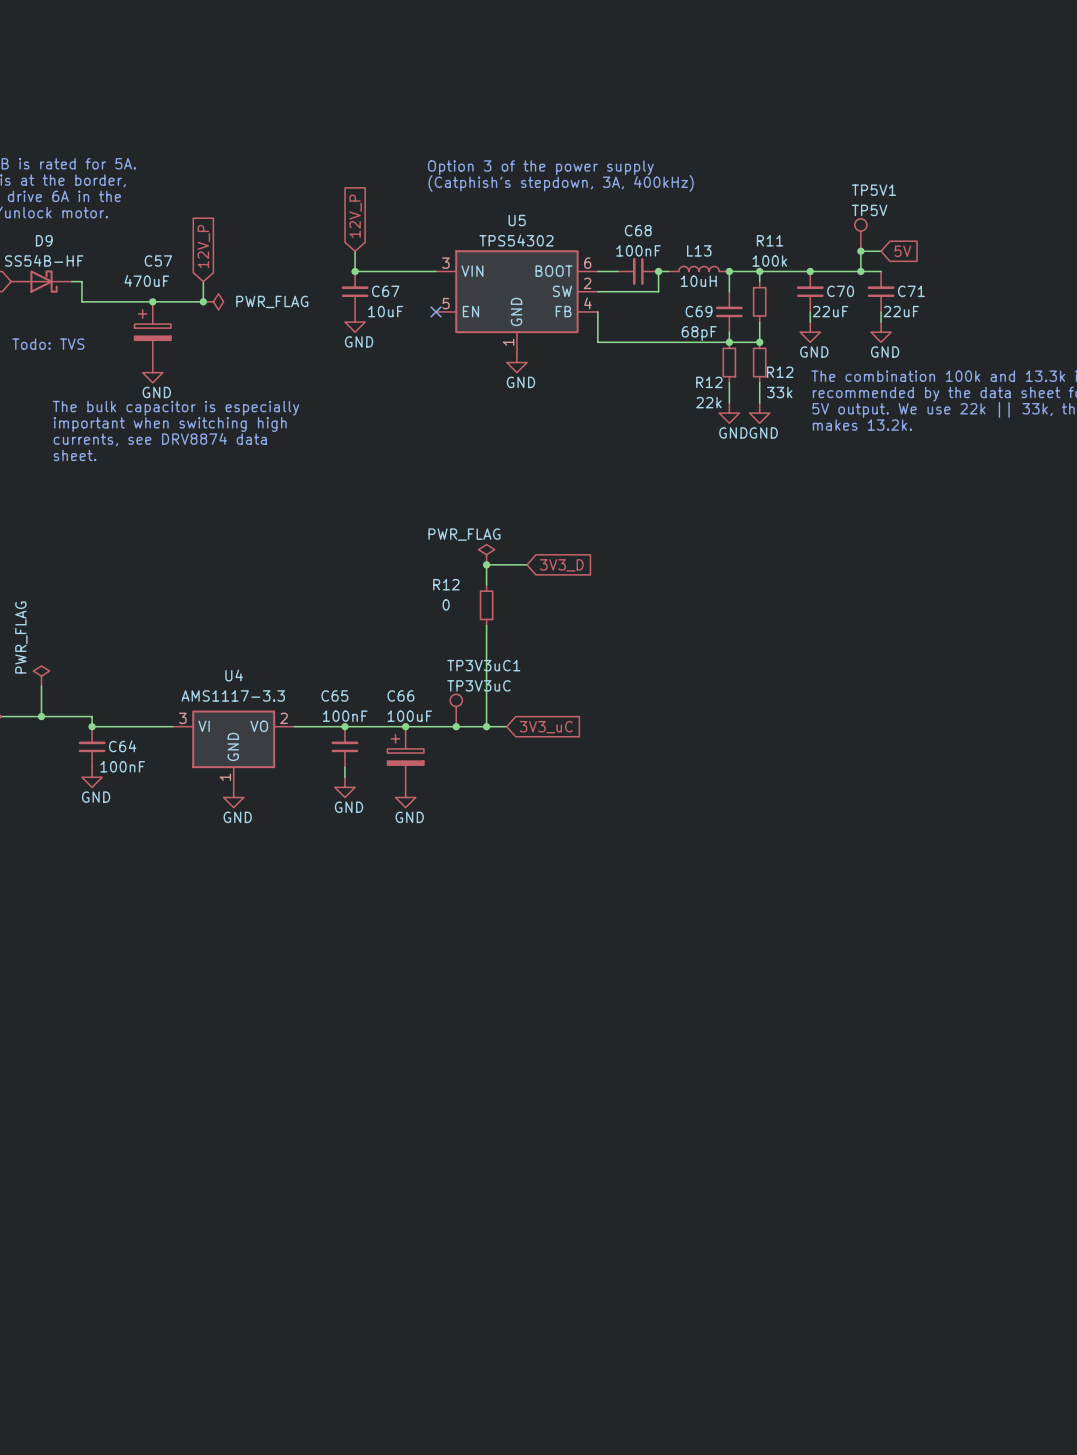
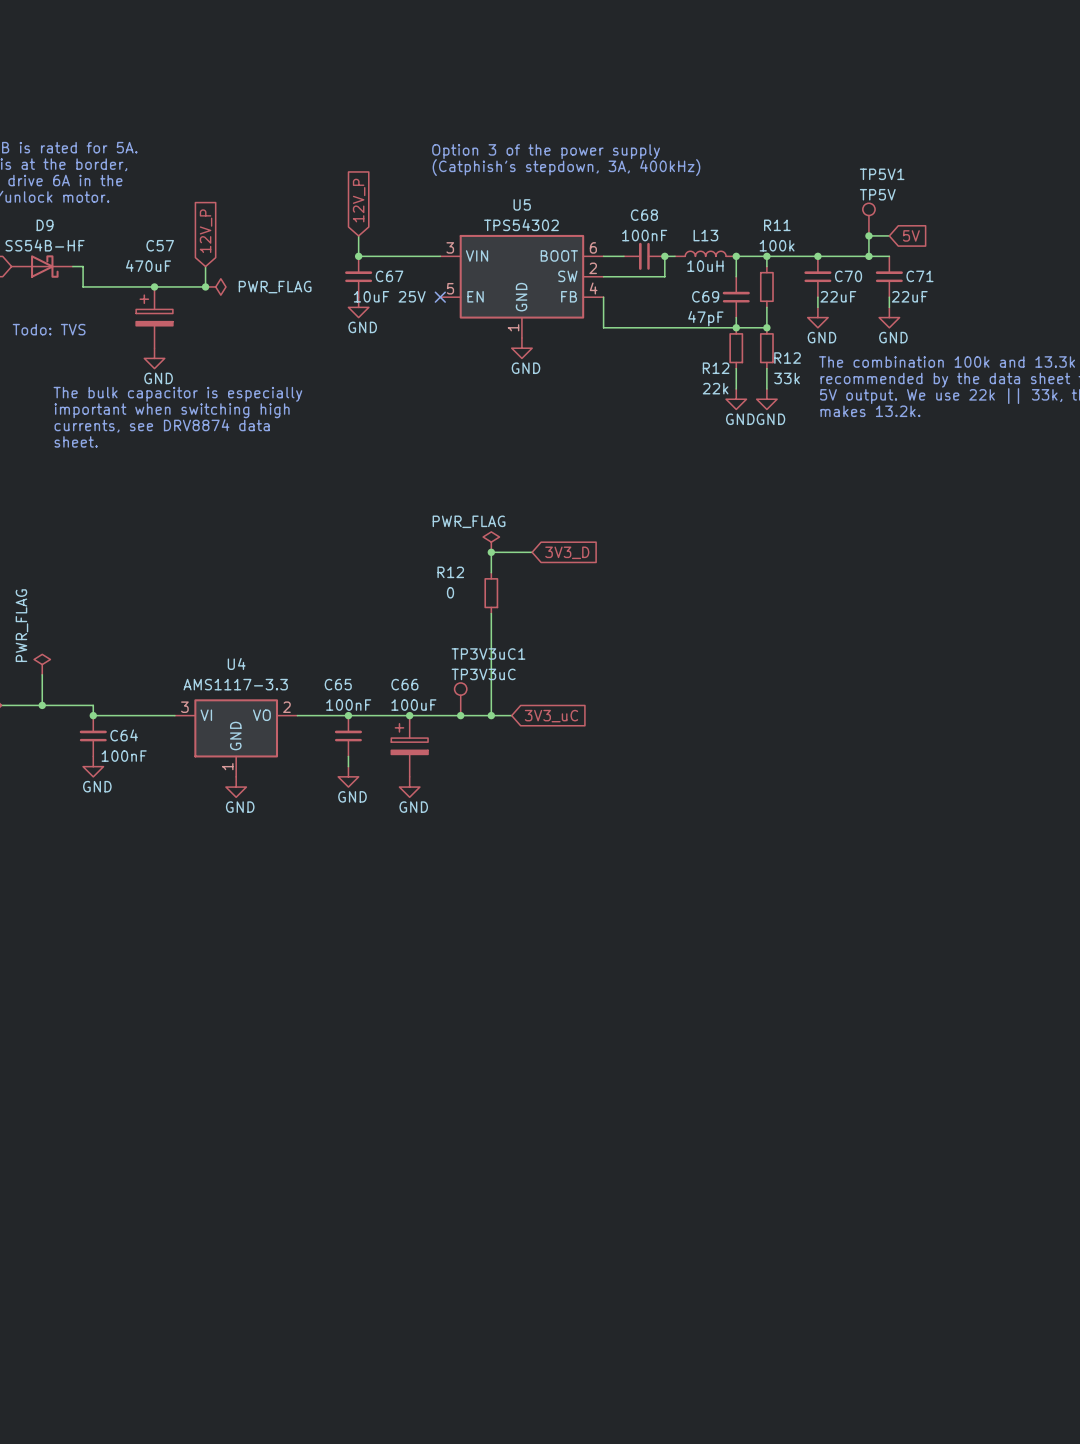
C67 value: 10uF (385, 311) -> 10uF 25V (389, 296)
C69 value: 68pF (699, 333) -> 47pF (705, 318)

